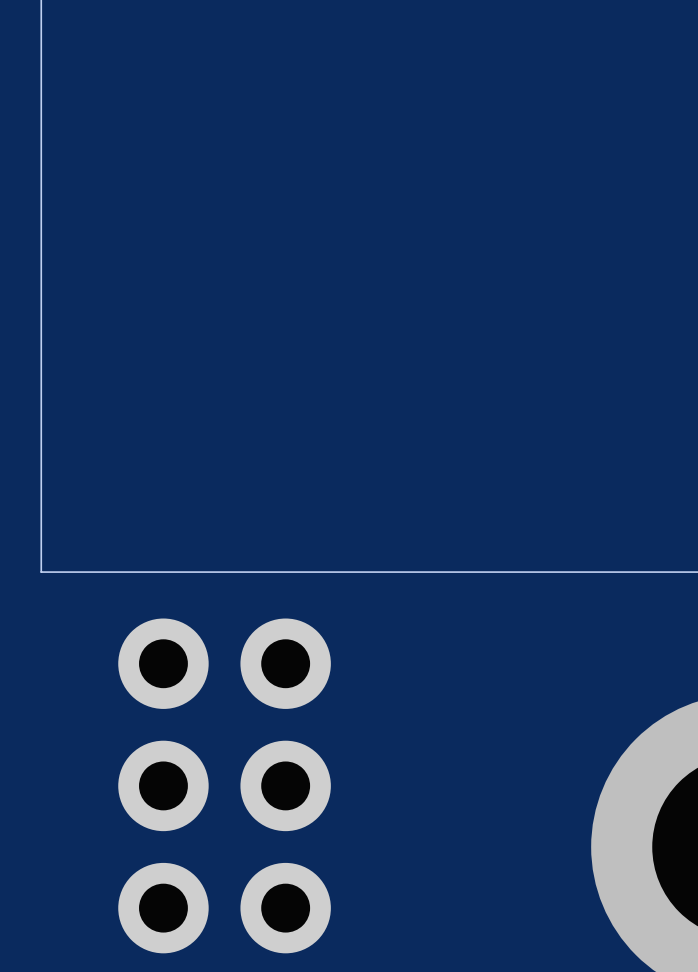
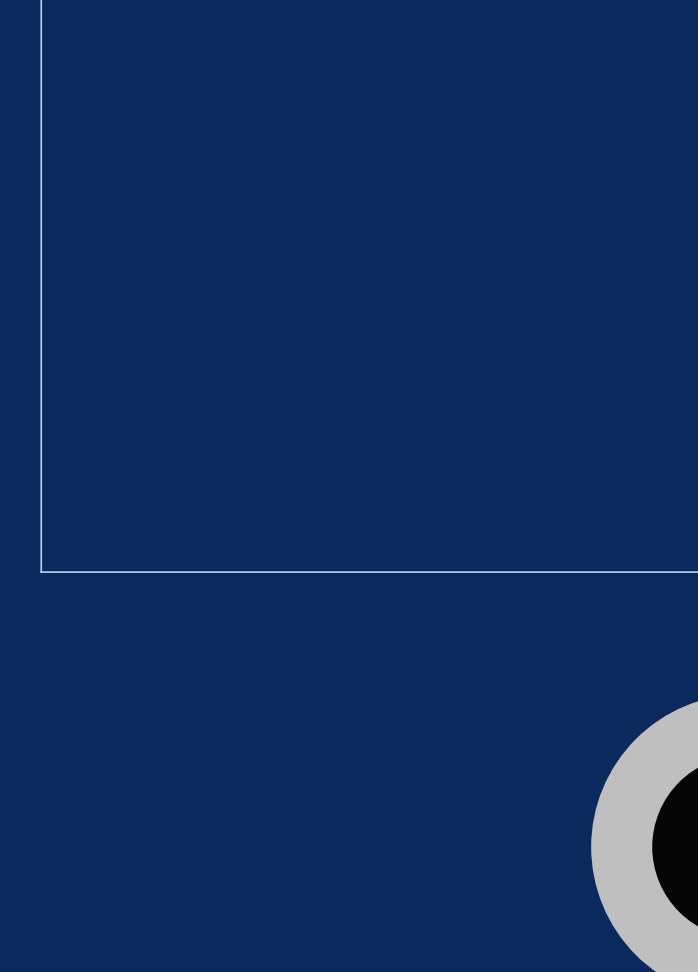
part: (163, 785) -> none
part: (285, 785) -> none

